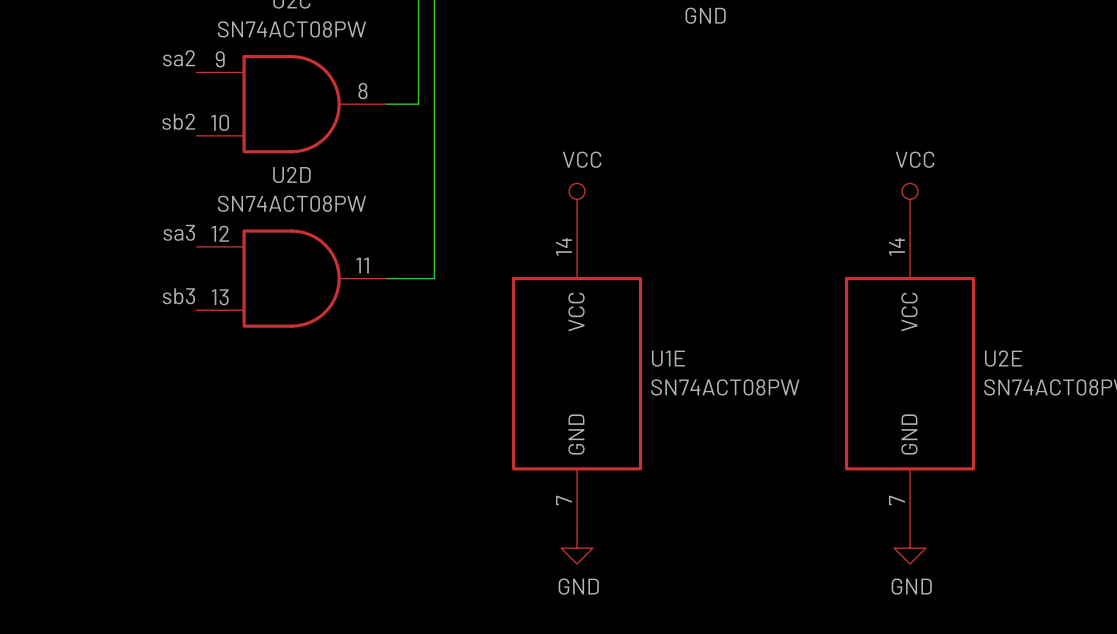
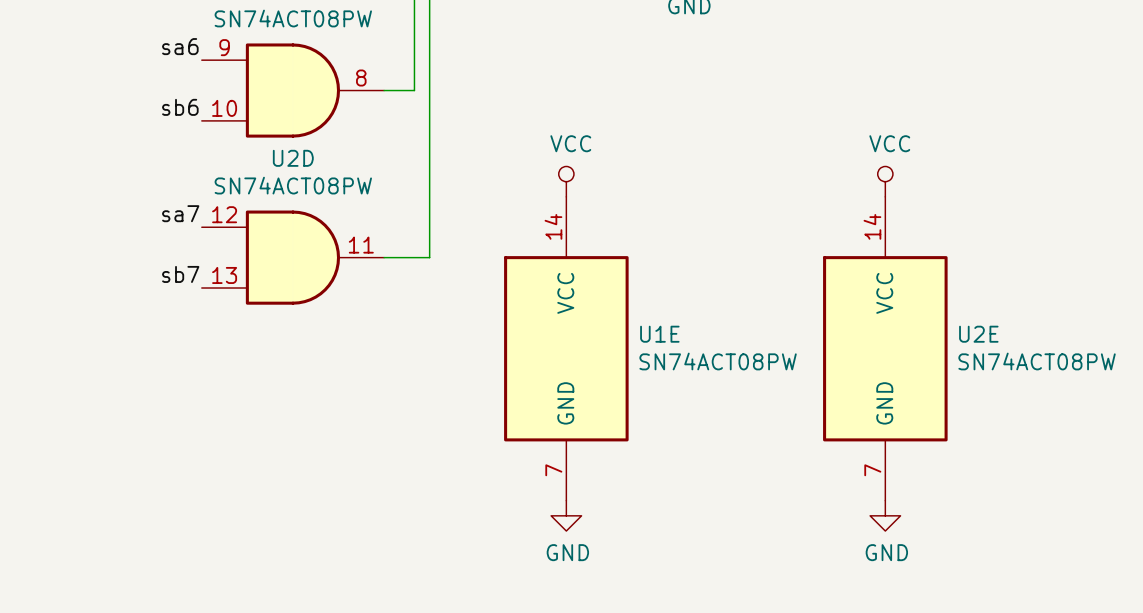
label: sa2 (179, 58) -> sa6 (180, 46)
label: sb2 (178, 121) -> sb6 (180, 107)
label: sa3 (179, 232) -> sa7 (180, 213)
label: sb3 (178, 296) -> sb7 (180, 274)

